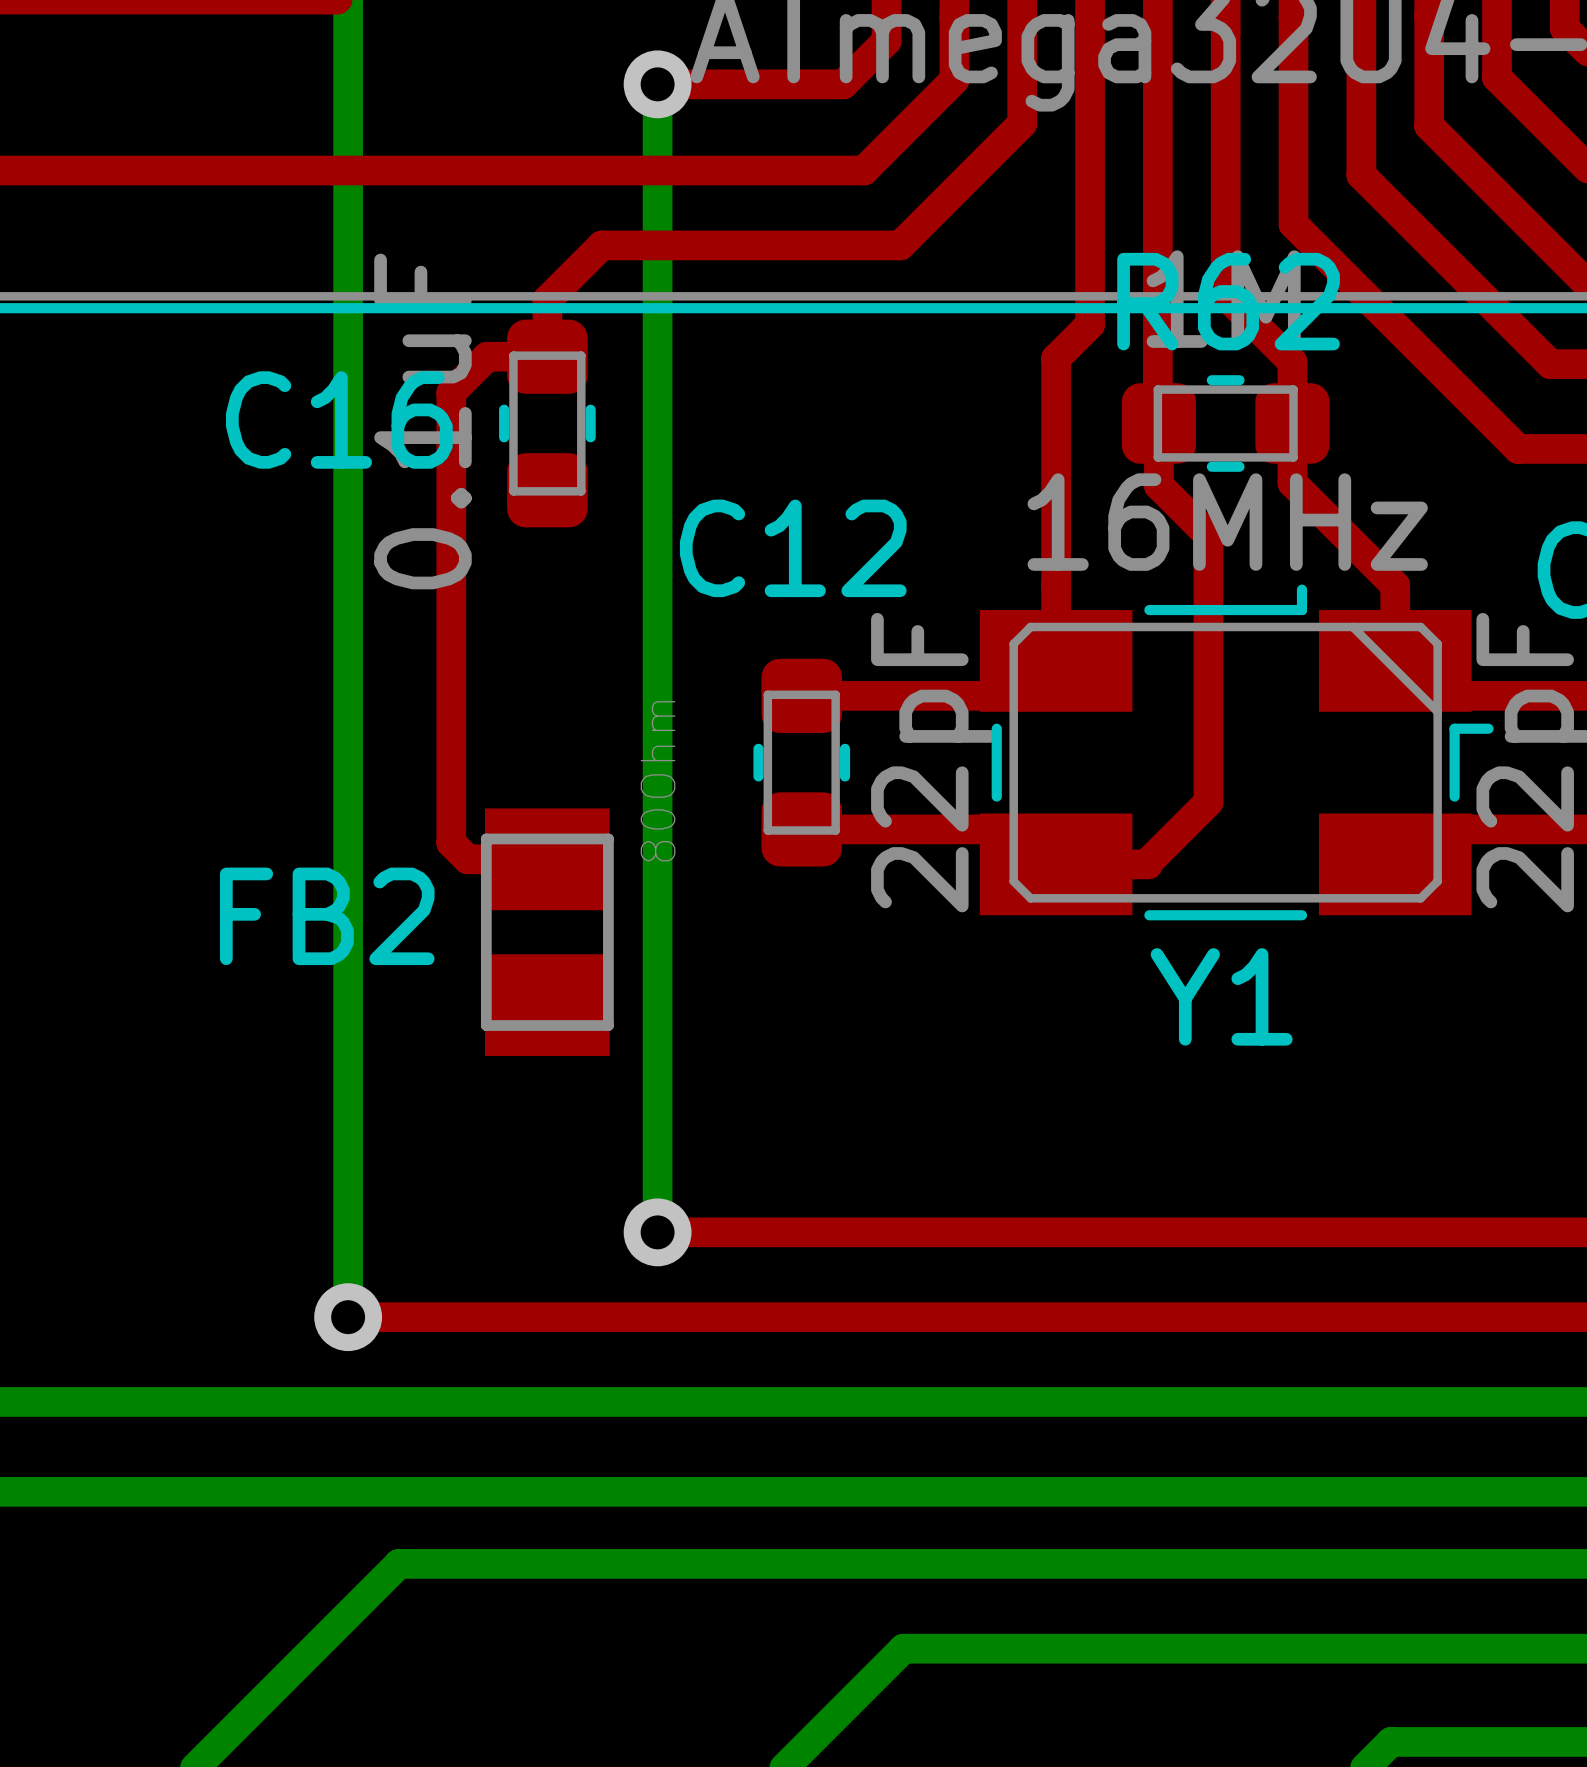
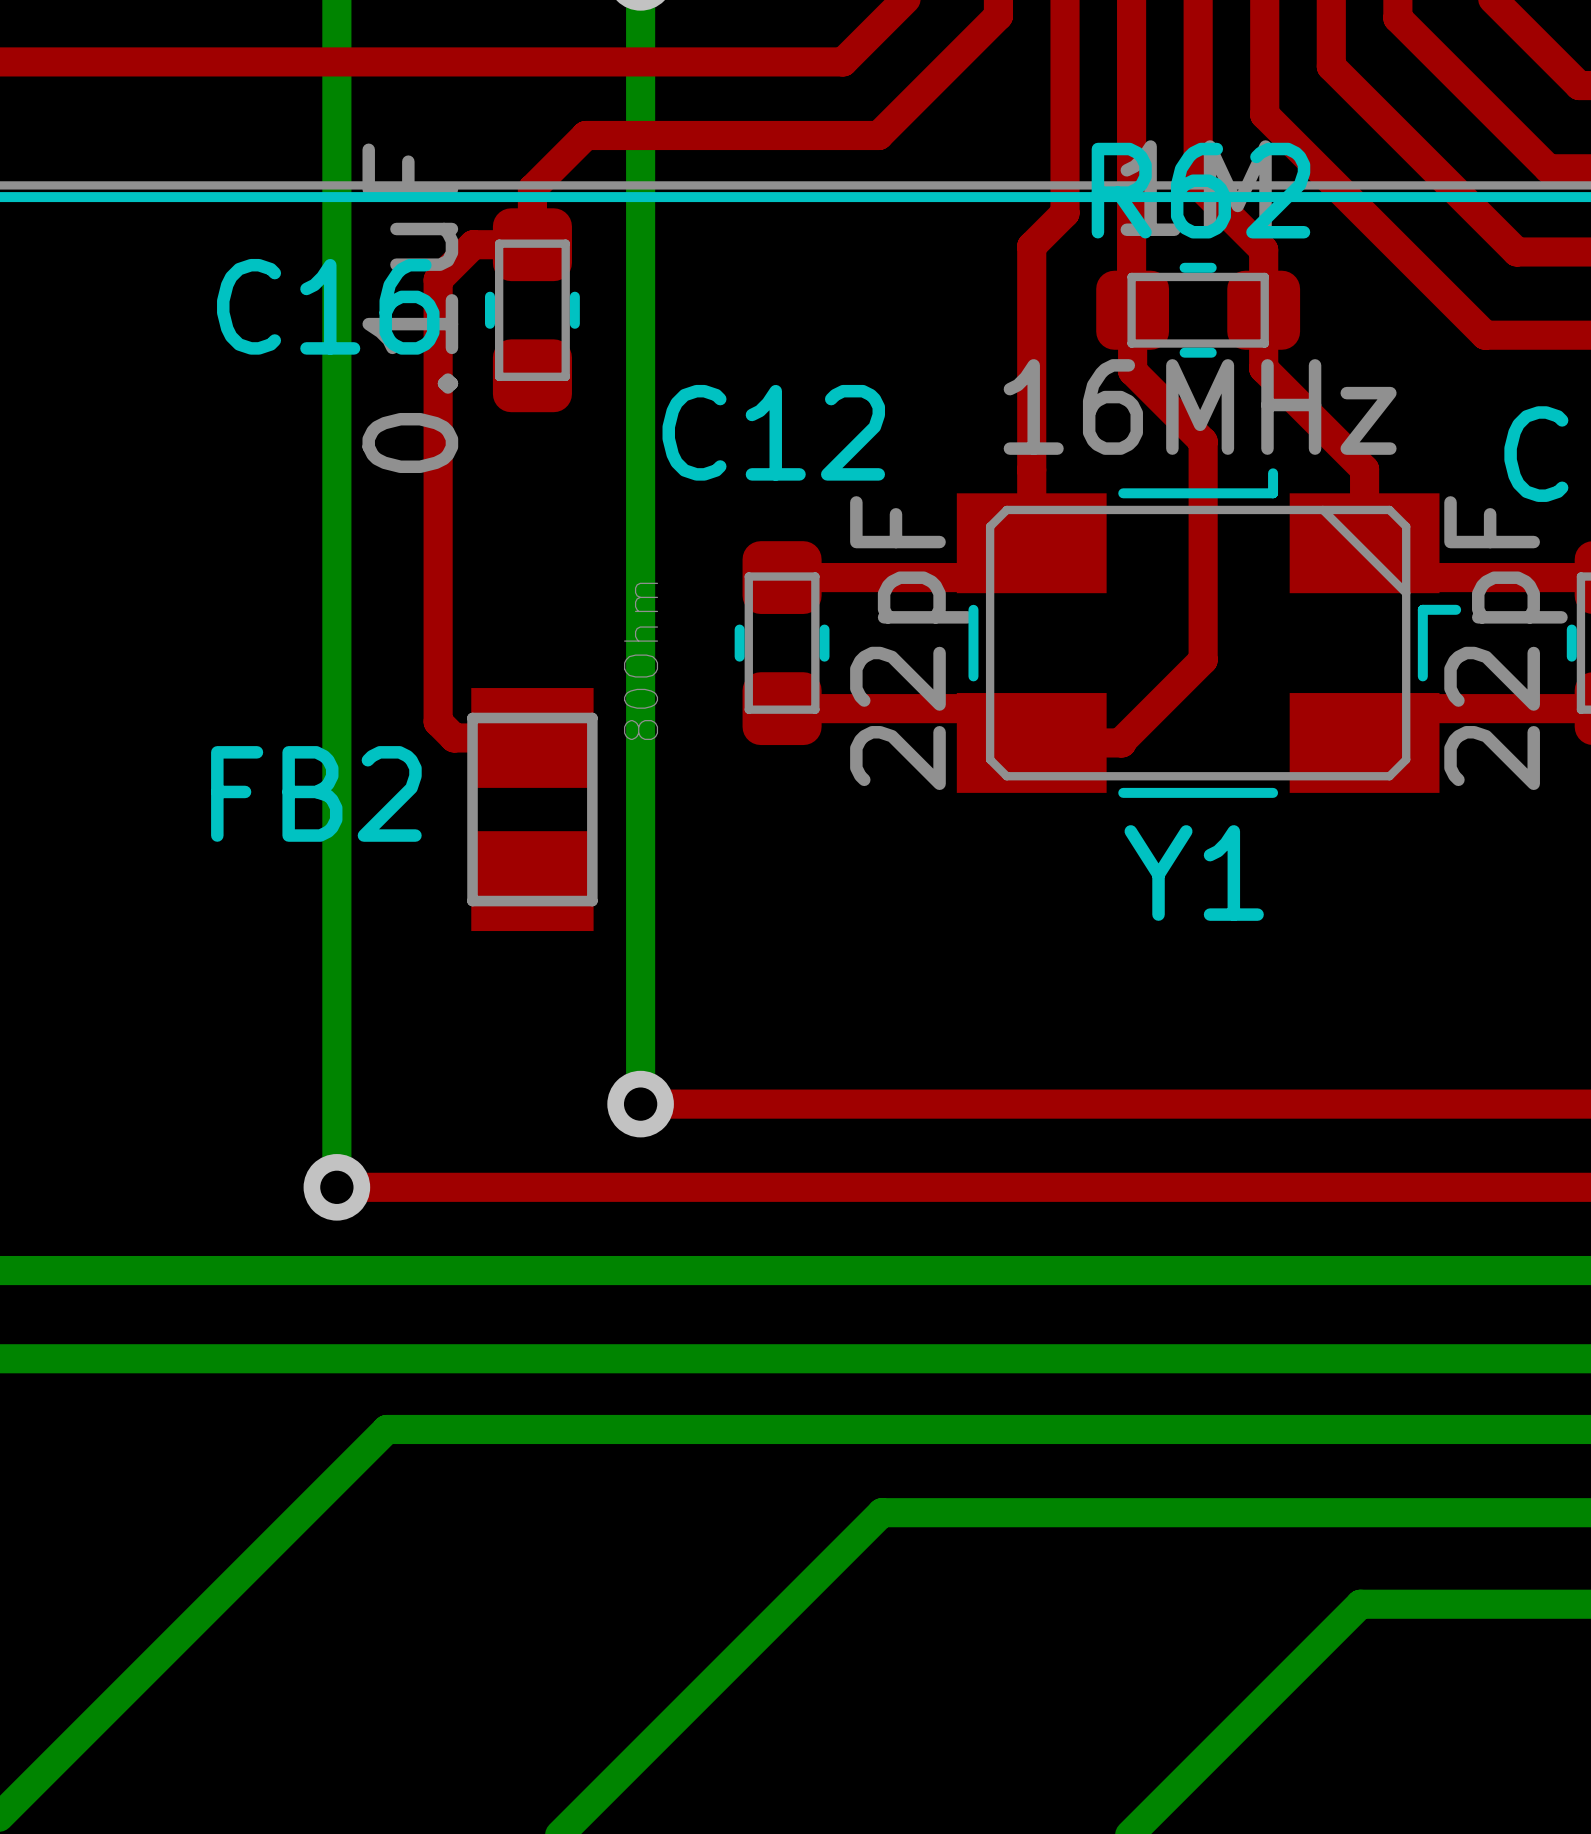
top track: (1208, 535) (1208, 802) -> (1181, 419) (1203, 441) (1203, 659) (1181, 681)

